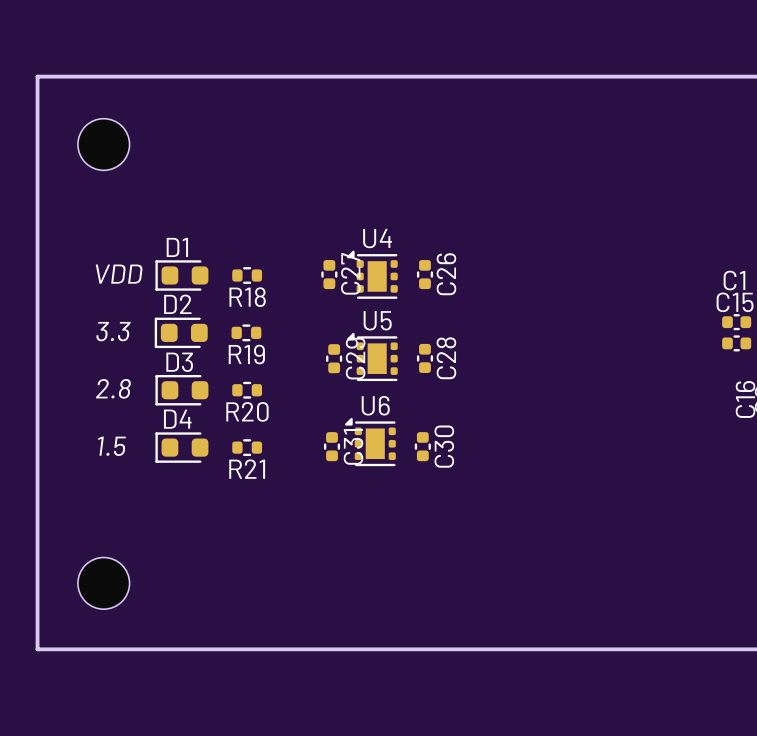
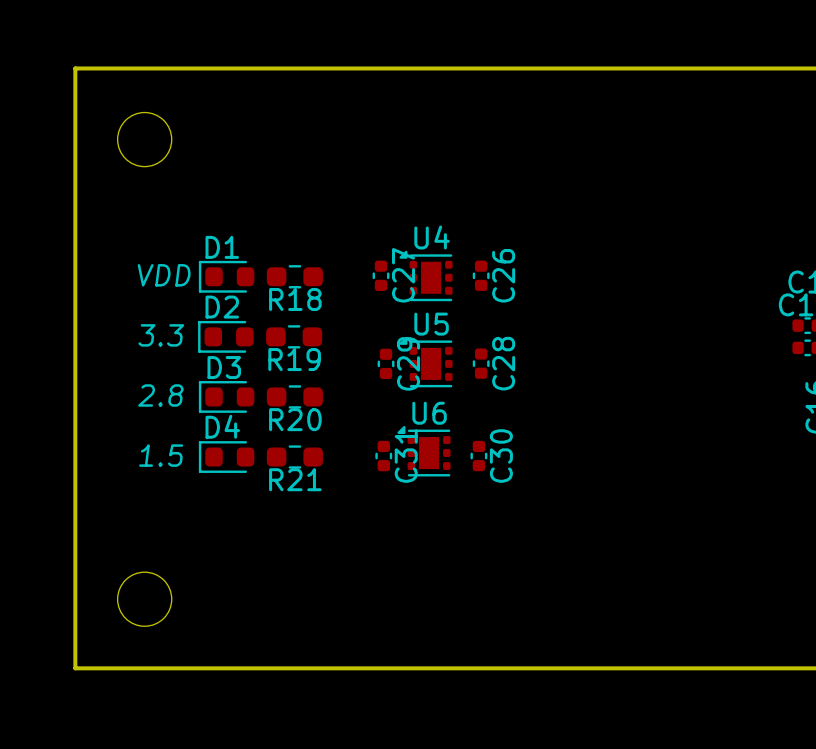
R18 footprint: [232, 267, 263, 284] -> [266, 265, 323, 289]
R19 footprint: [231, 324, 262, 342] -> [266, 325, 323, 349]
R20 footprint: [232, 381, 263, 399] -> [266, 385, 323, 409]
R21 footprint: [232, 439, 263, 457] -> [266, 445, 323, 469]

